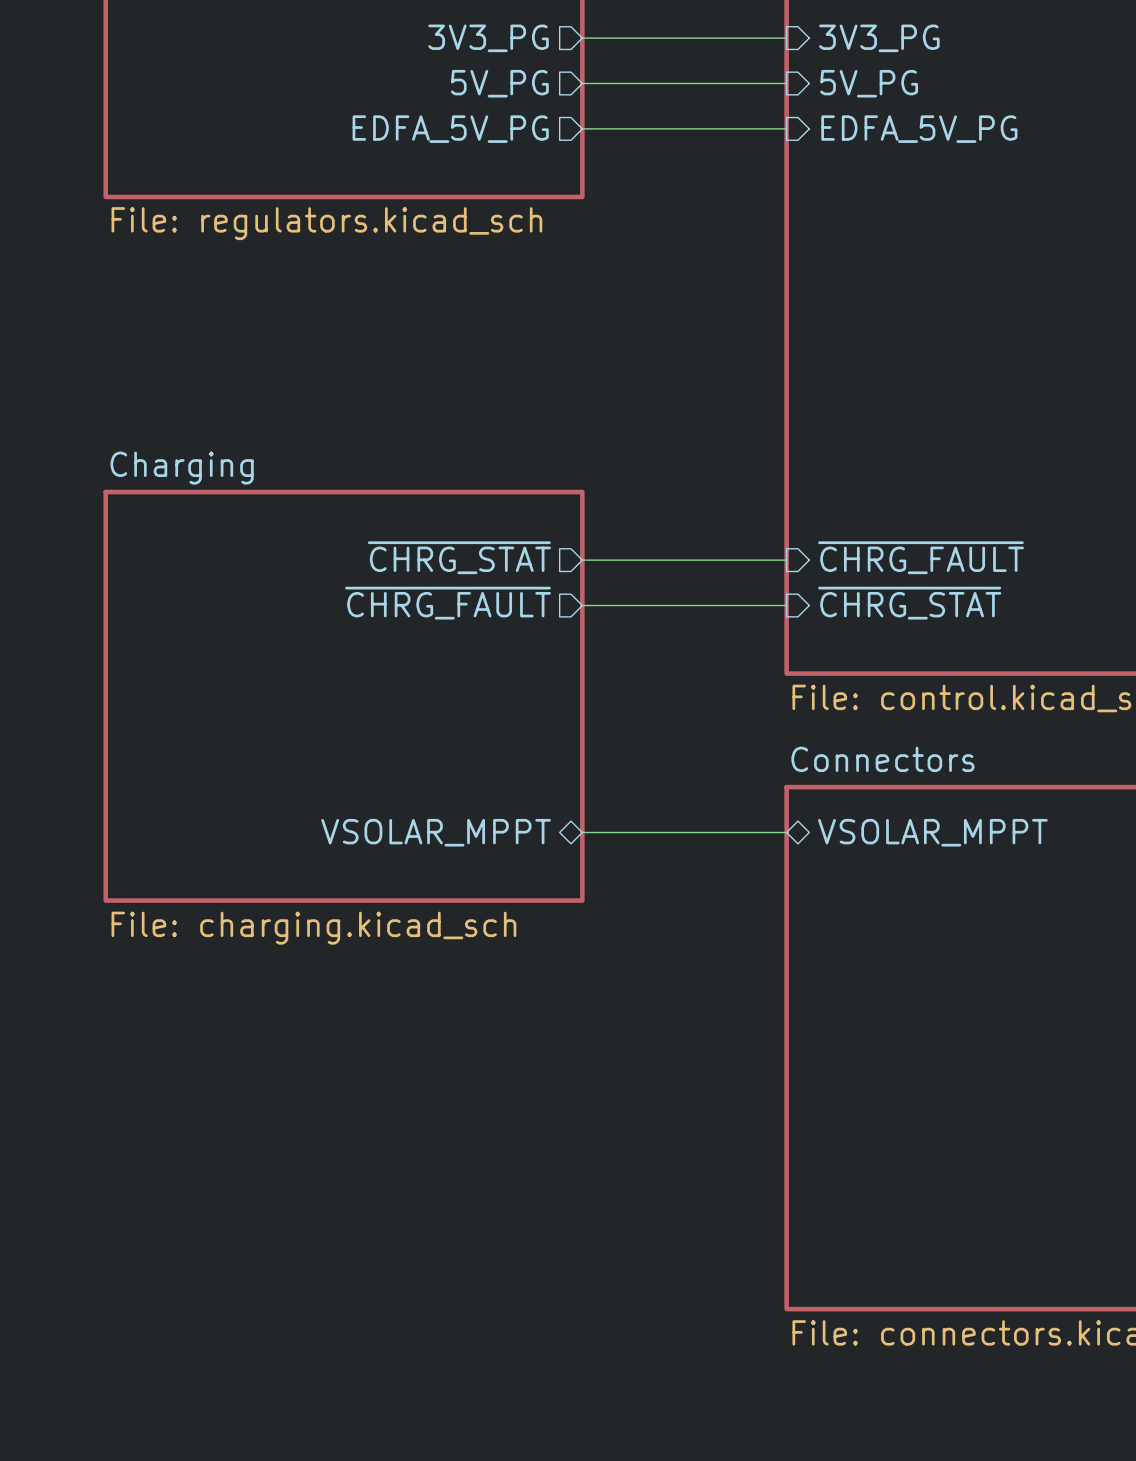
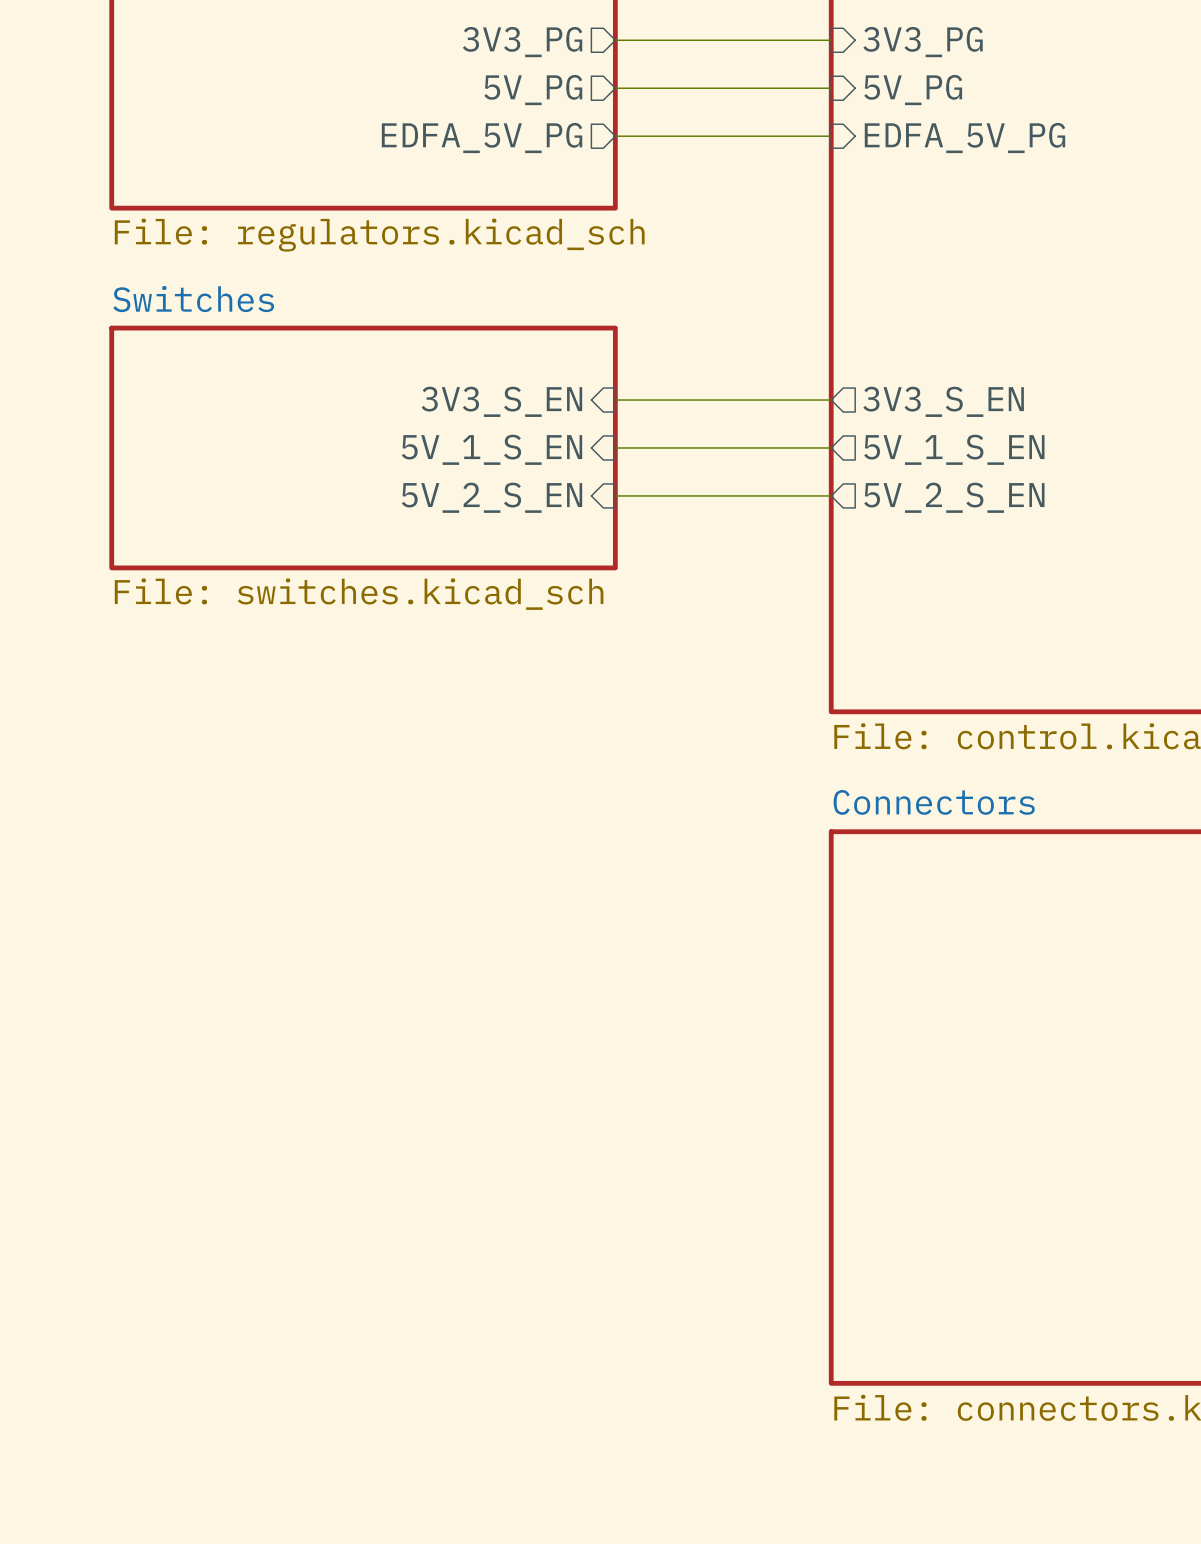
sheet pin: none -> 3V3_S_EN (501, 401)
wire: none -> (615, 400) (831, 400)
sheet pin: none -> 3V3_S_EN (943, 401)
sheet Switches: none -> File: switches.kicad_sch (363, 447)
sheet pin: none -> 5V_1_S_EN (492, 449)
sheet pin: none -> 5V_1_S_EN (954, 449)
sheet pin: none -> 5V_2_S_EN (492, 497)
sheet pin: none -> 5V_2_S_EN (954, 497)
sheet pin: ~{CHRG_STAT} (459, 557) -> none
sheet pin: ~{CHRG_FAULT} (921, 557) -> none
wire: (582, 560) (786, 560) -> (615, 447) (831, 447)
sheet pin: ~{CHRG_FAULT} (448, 603) -> none
sheet pin: ~{CHRG_STAT} (909, 603) -> none
wire: (582, 605) (786, 605) -> (615, 495) (831, 495)
sheet Charging: File: charging.kicad_sch (344, 696) -> none
sheet pin: VSOLAR_MPPT (436, 832) -> none
wire: (582, 832) (786, 832) -> none
sheet pin: VSOLAR_MPPT (932, 832) -> none

